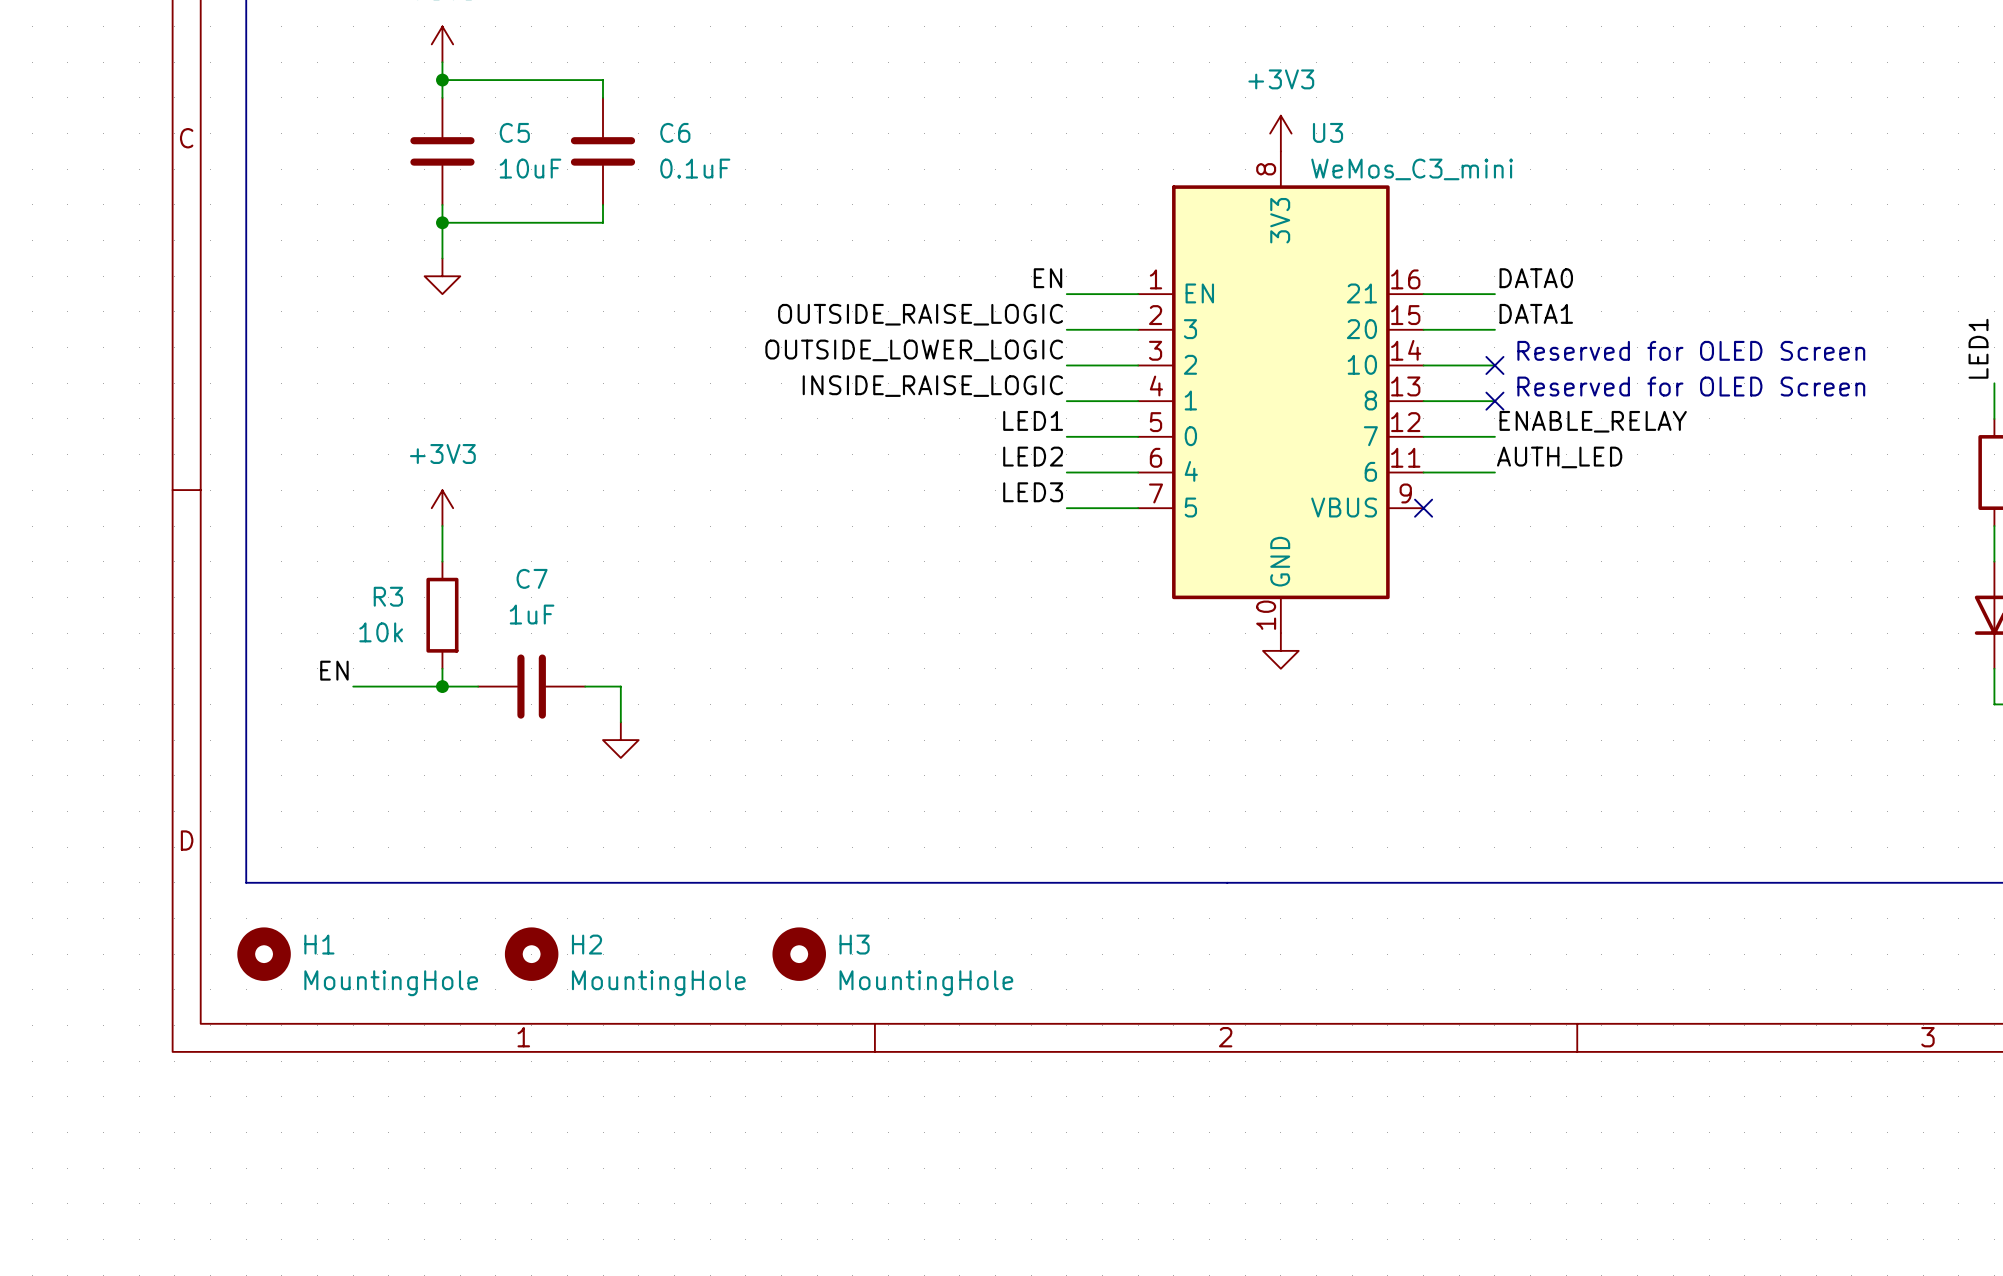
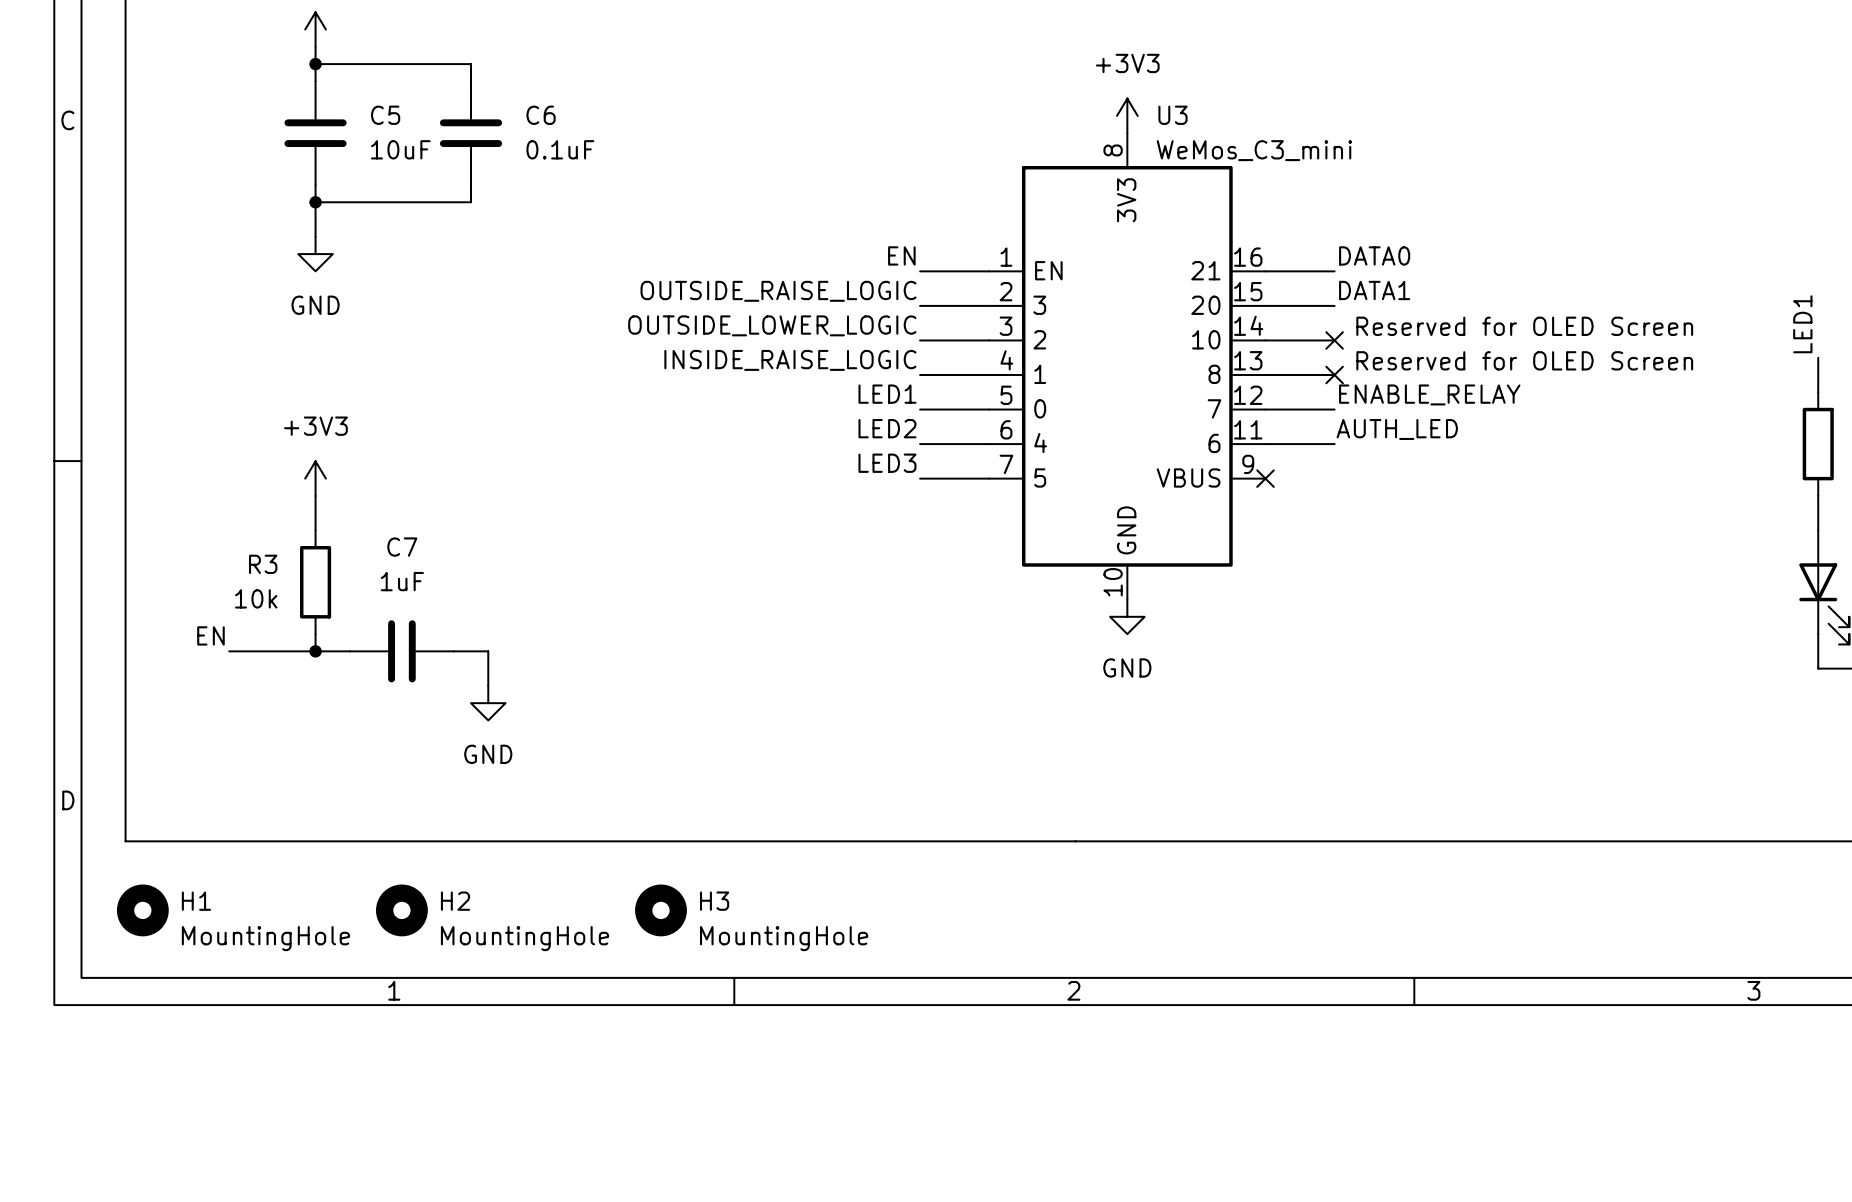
power symbol text: none -> GND (315, 305)
power symbol text: none -> GND (1127, 667)
power symbol text: none -> GND (488, 754)

